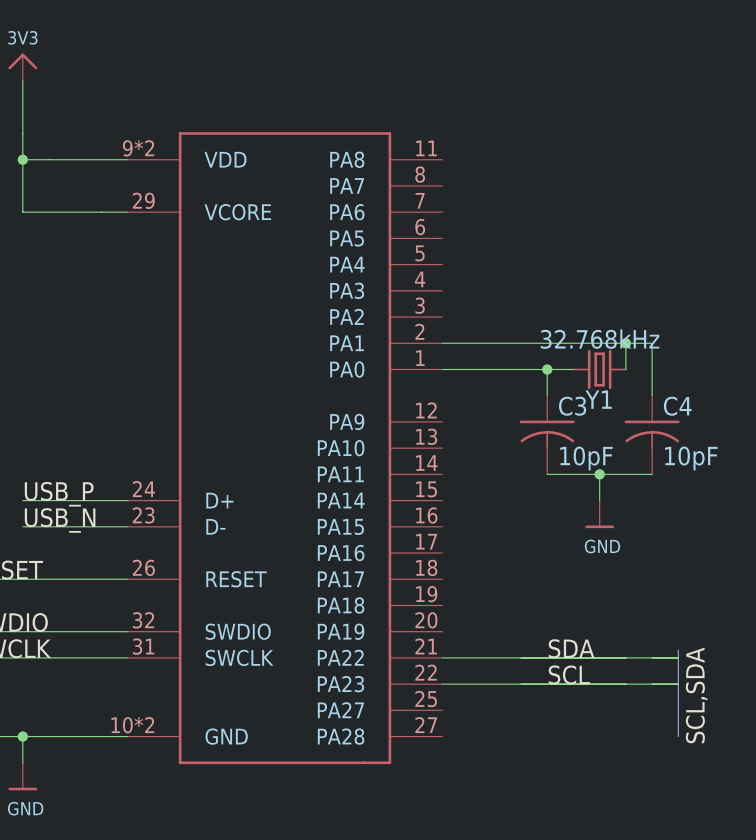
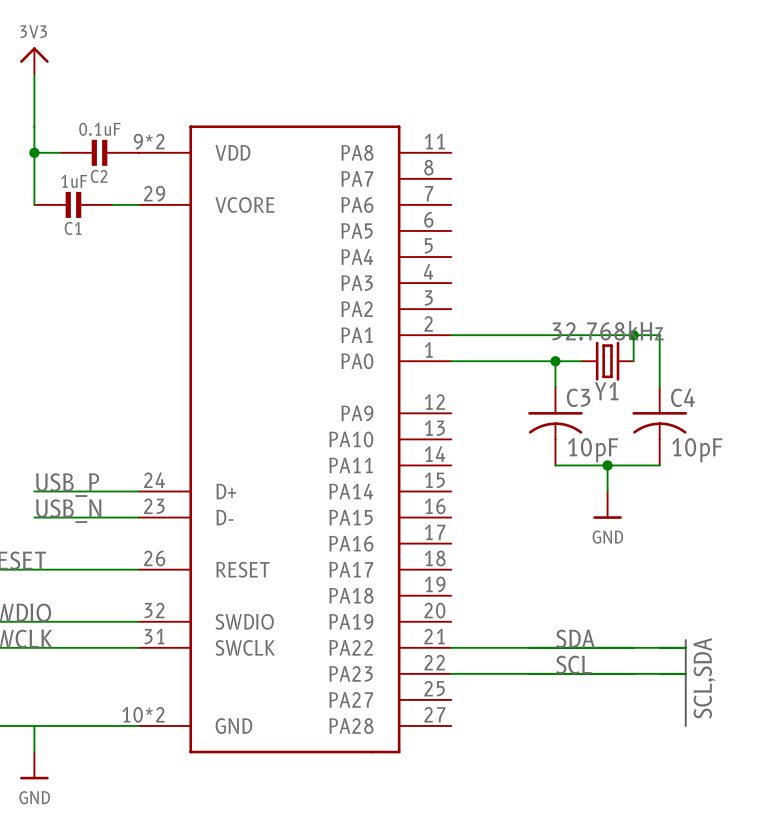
C2: none -> 0.1uF (99, 152)
C1: none -> 1uF (73, 204)
junction: (22, 736) -> none

